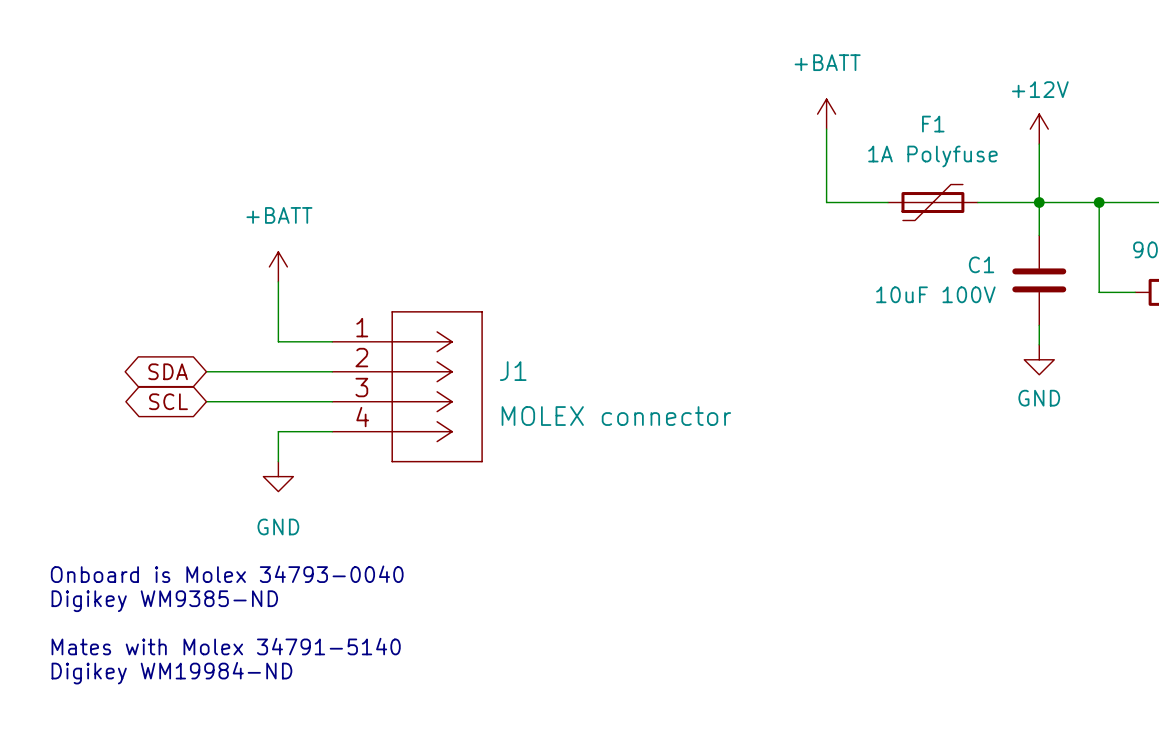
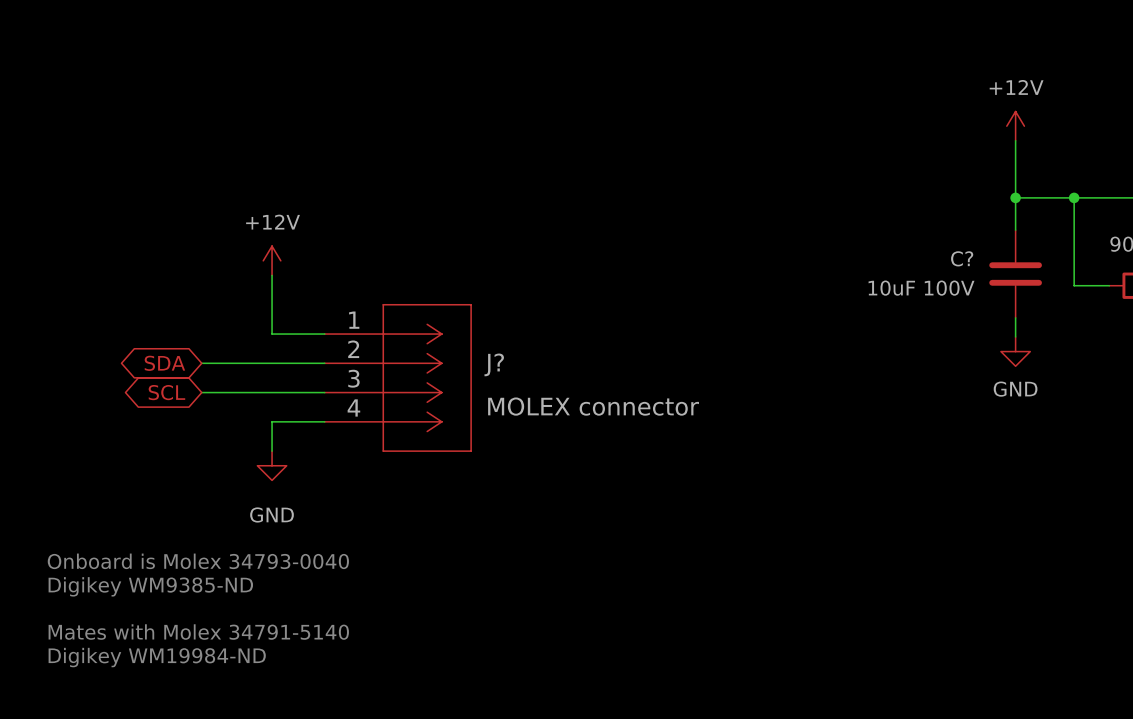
power symbol: +BATT (826, 114) -> none
wire: (826, 129) (826, 202) (888, 202) -> none
F1: 1A Polyfuse (932, 202) -> none
wire: (977, 202) (1039, 202) -> none
C1 name: C1 (981, 264) -> C? (962, 258)
power symbol: +BATT (278, 266) -> +12V (272, 260)
J1 name: J1 (513, 371) -> J? (494, 364)

